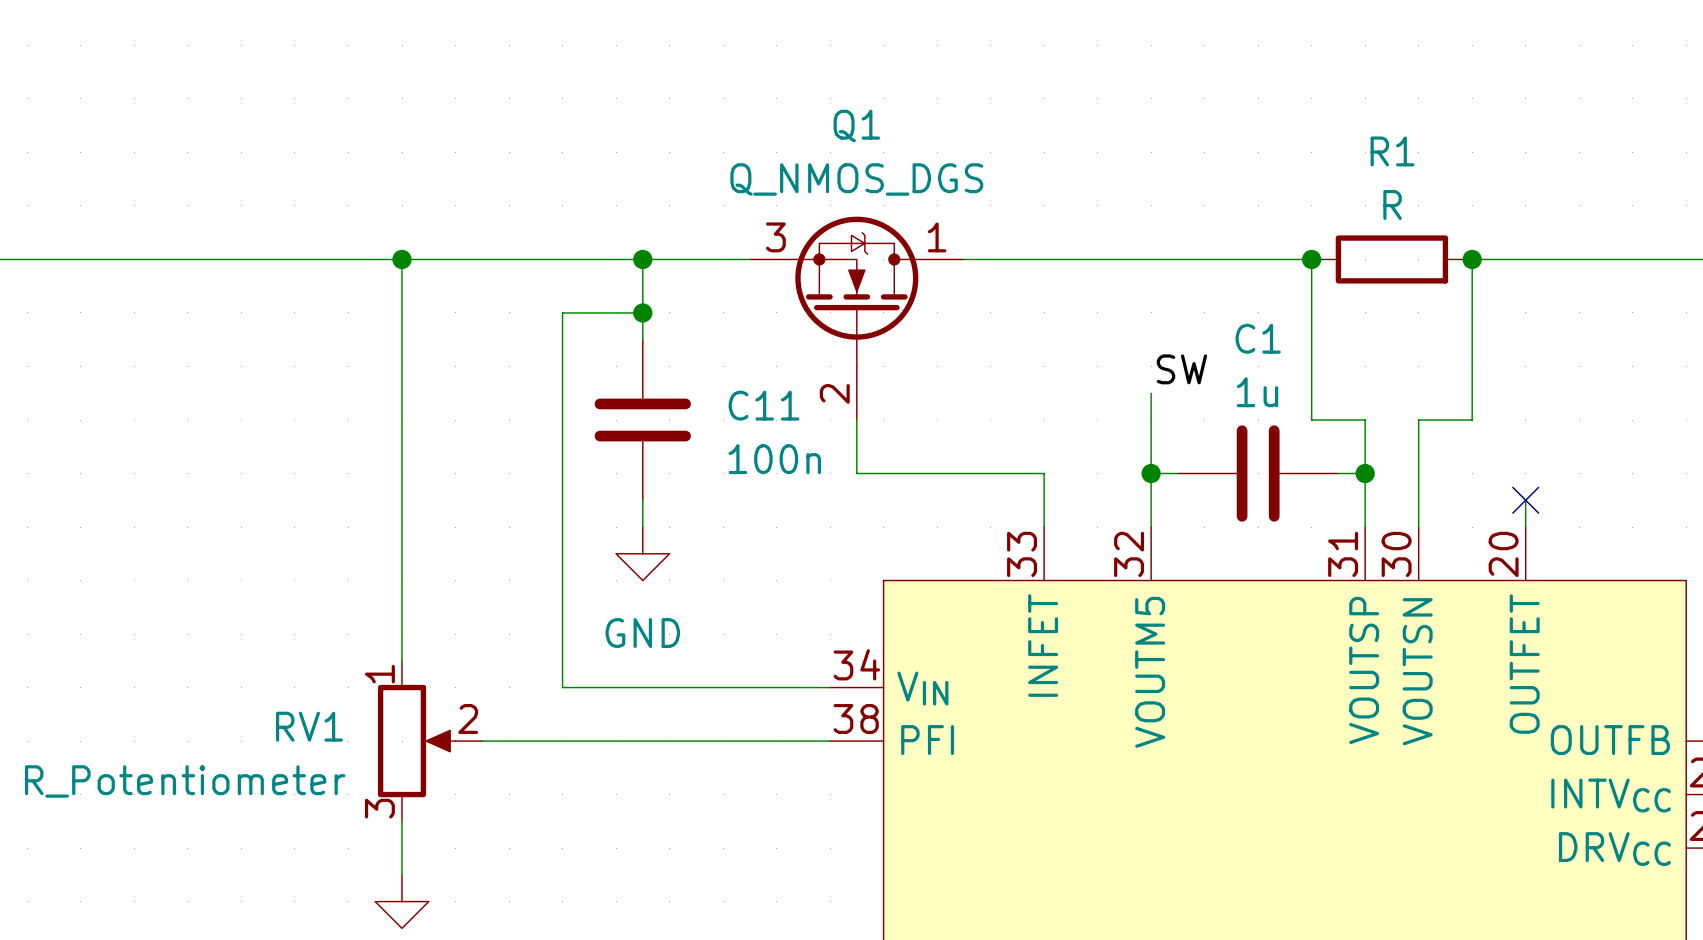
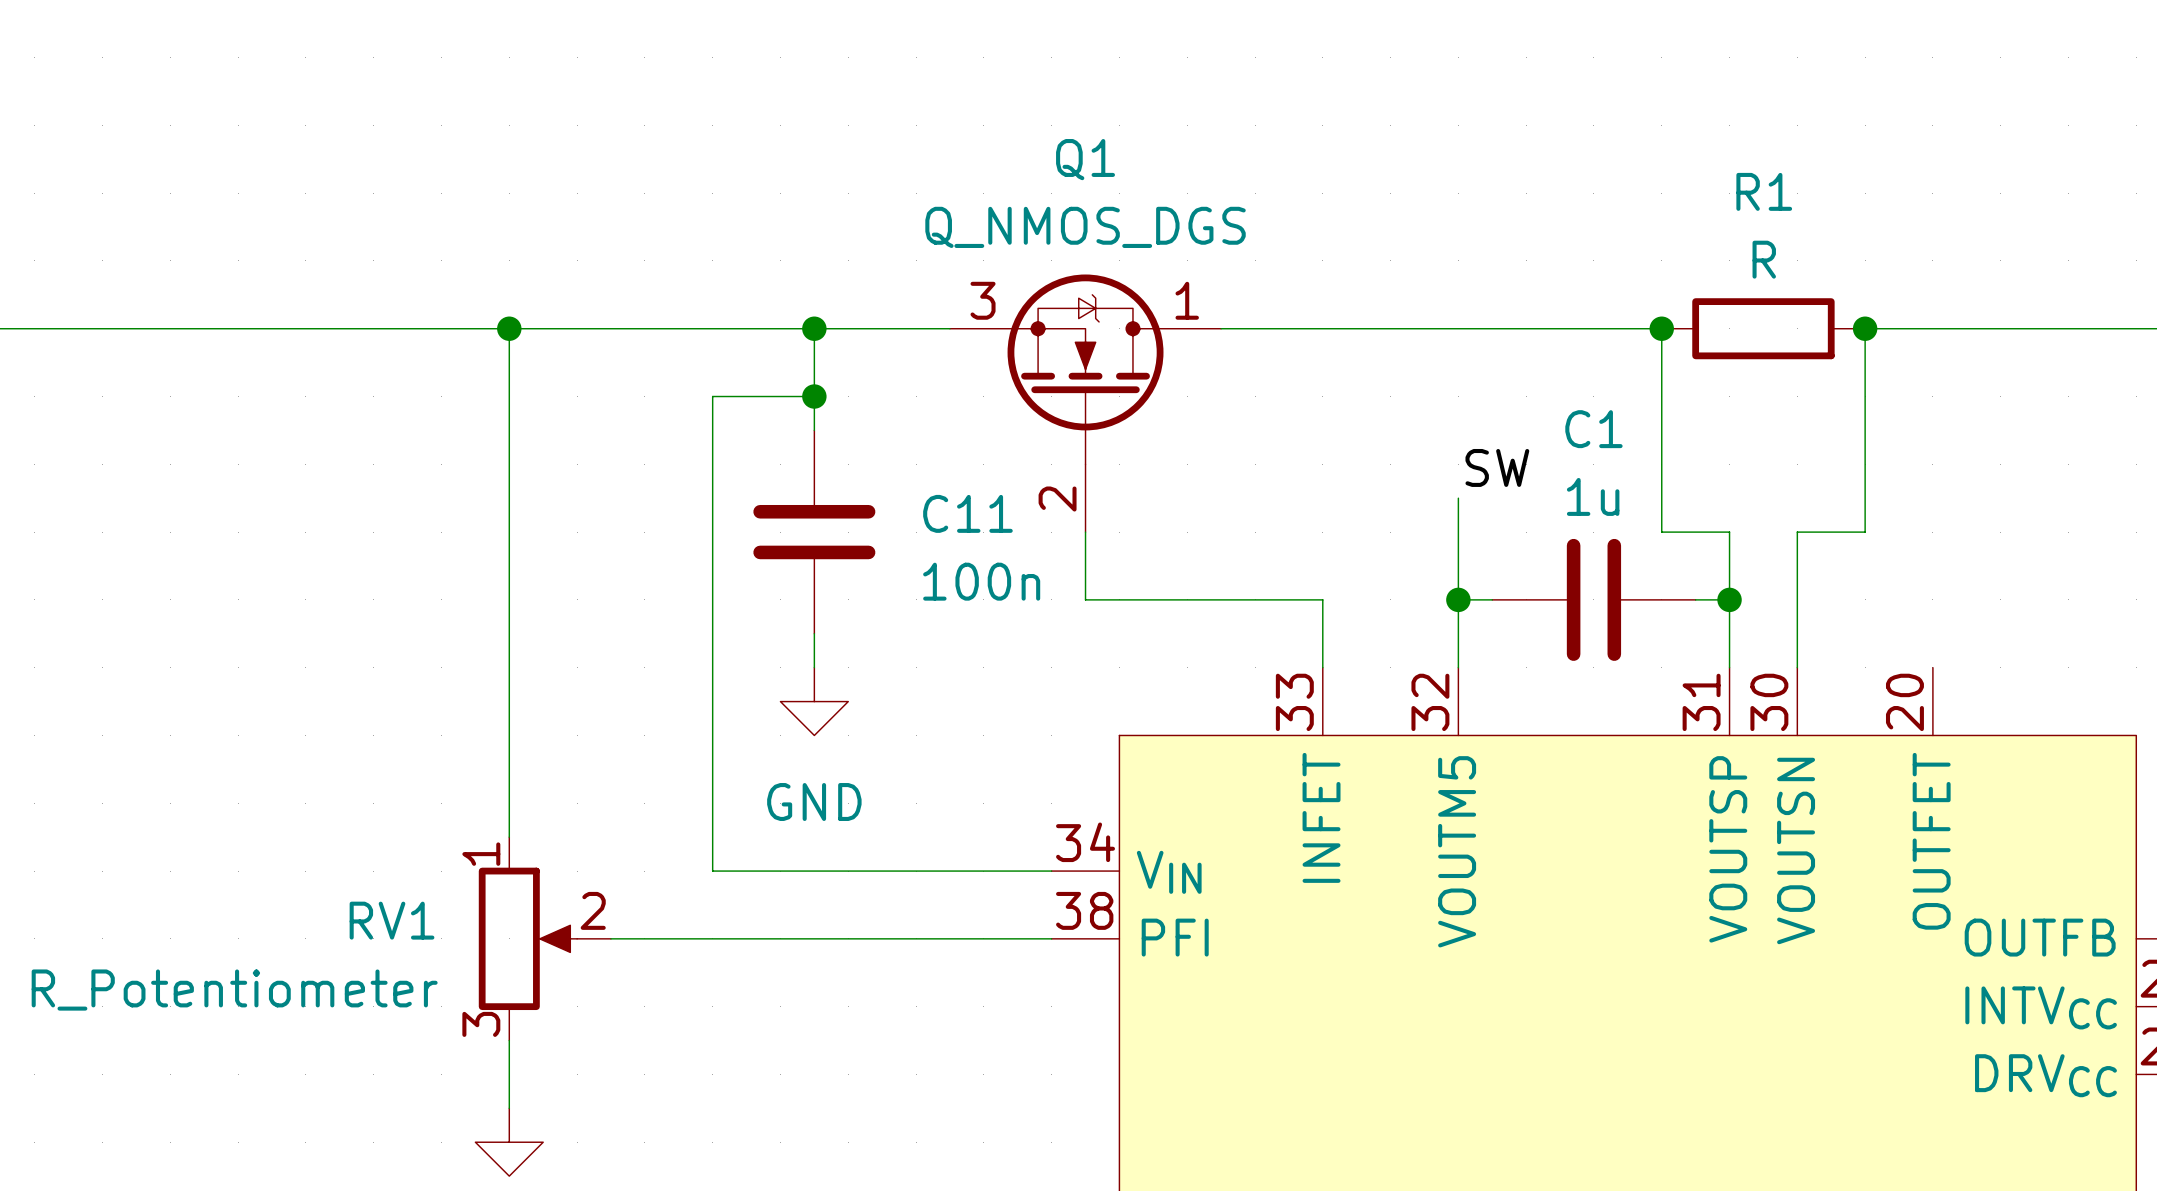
wire: (1525, 500) (1525, 527) -> none
no-connect mark: (1525, 500) -> none

